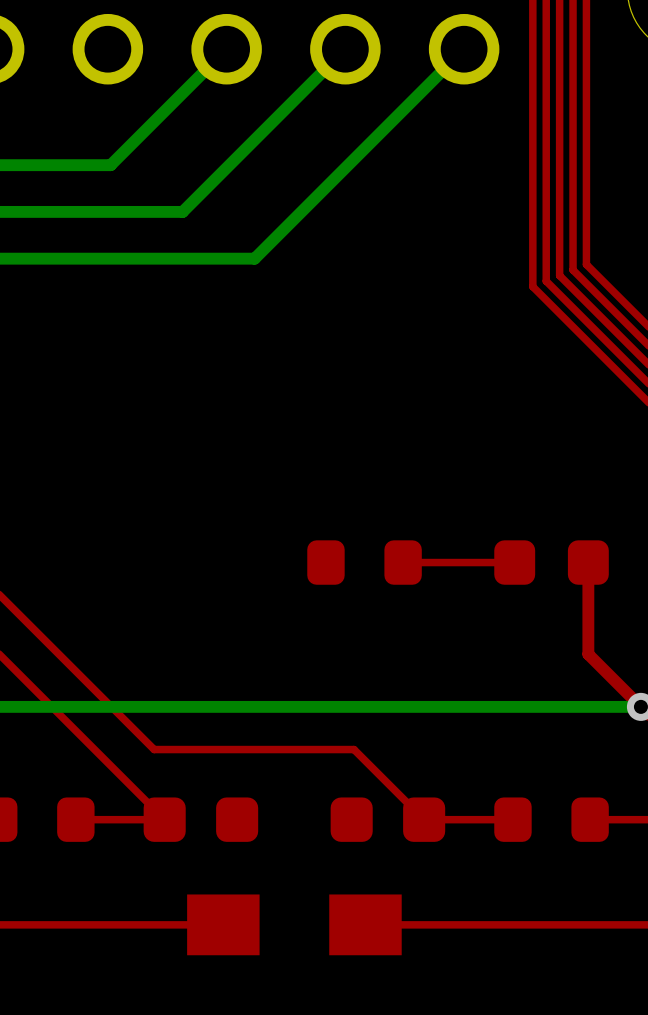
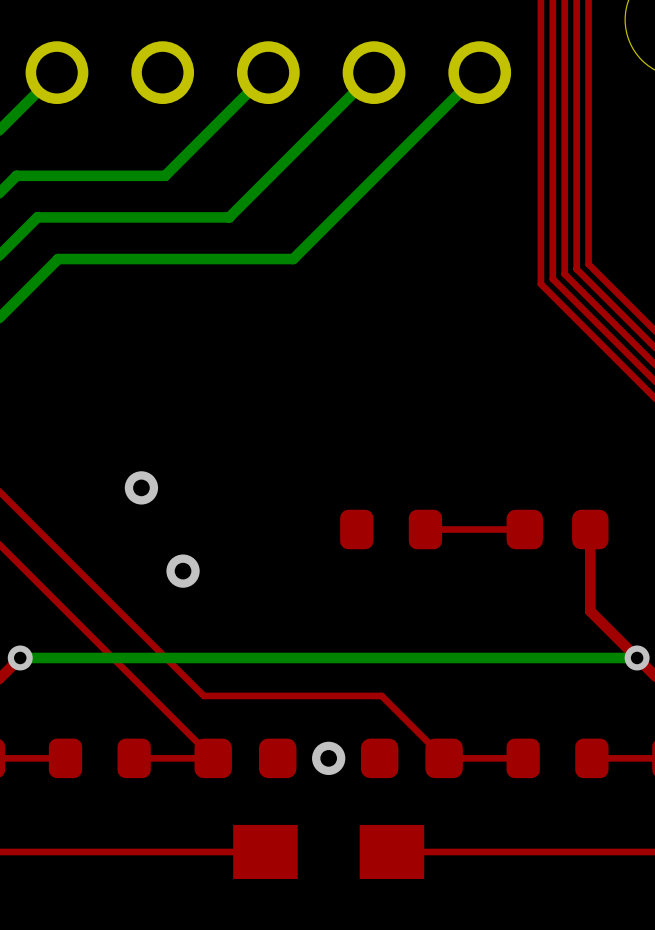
via: none -> (141, 487)
via: none -> (183, 571)
via: none -> (328, 758)

